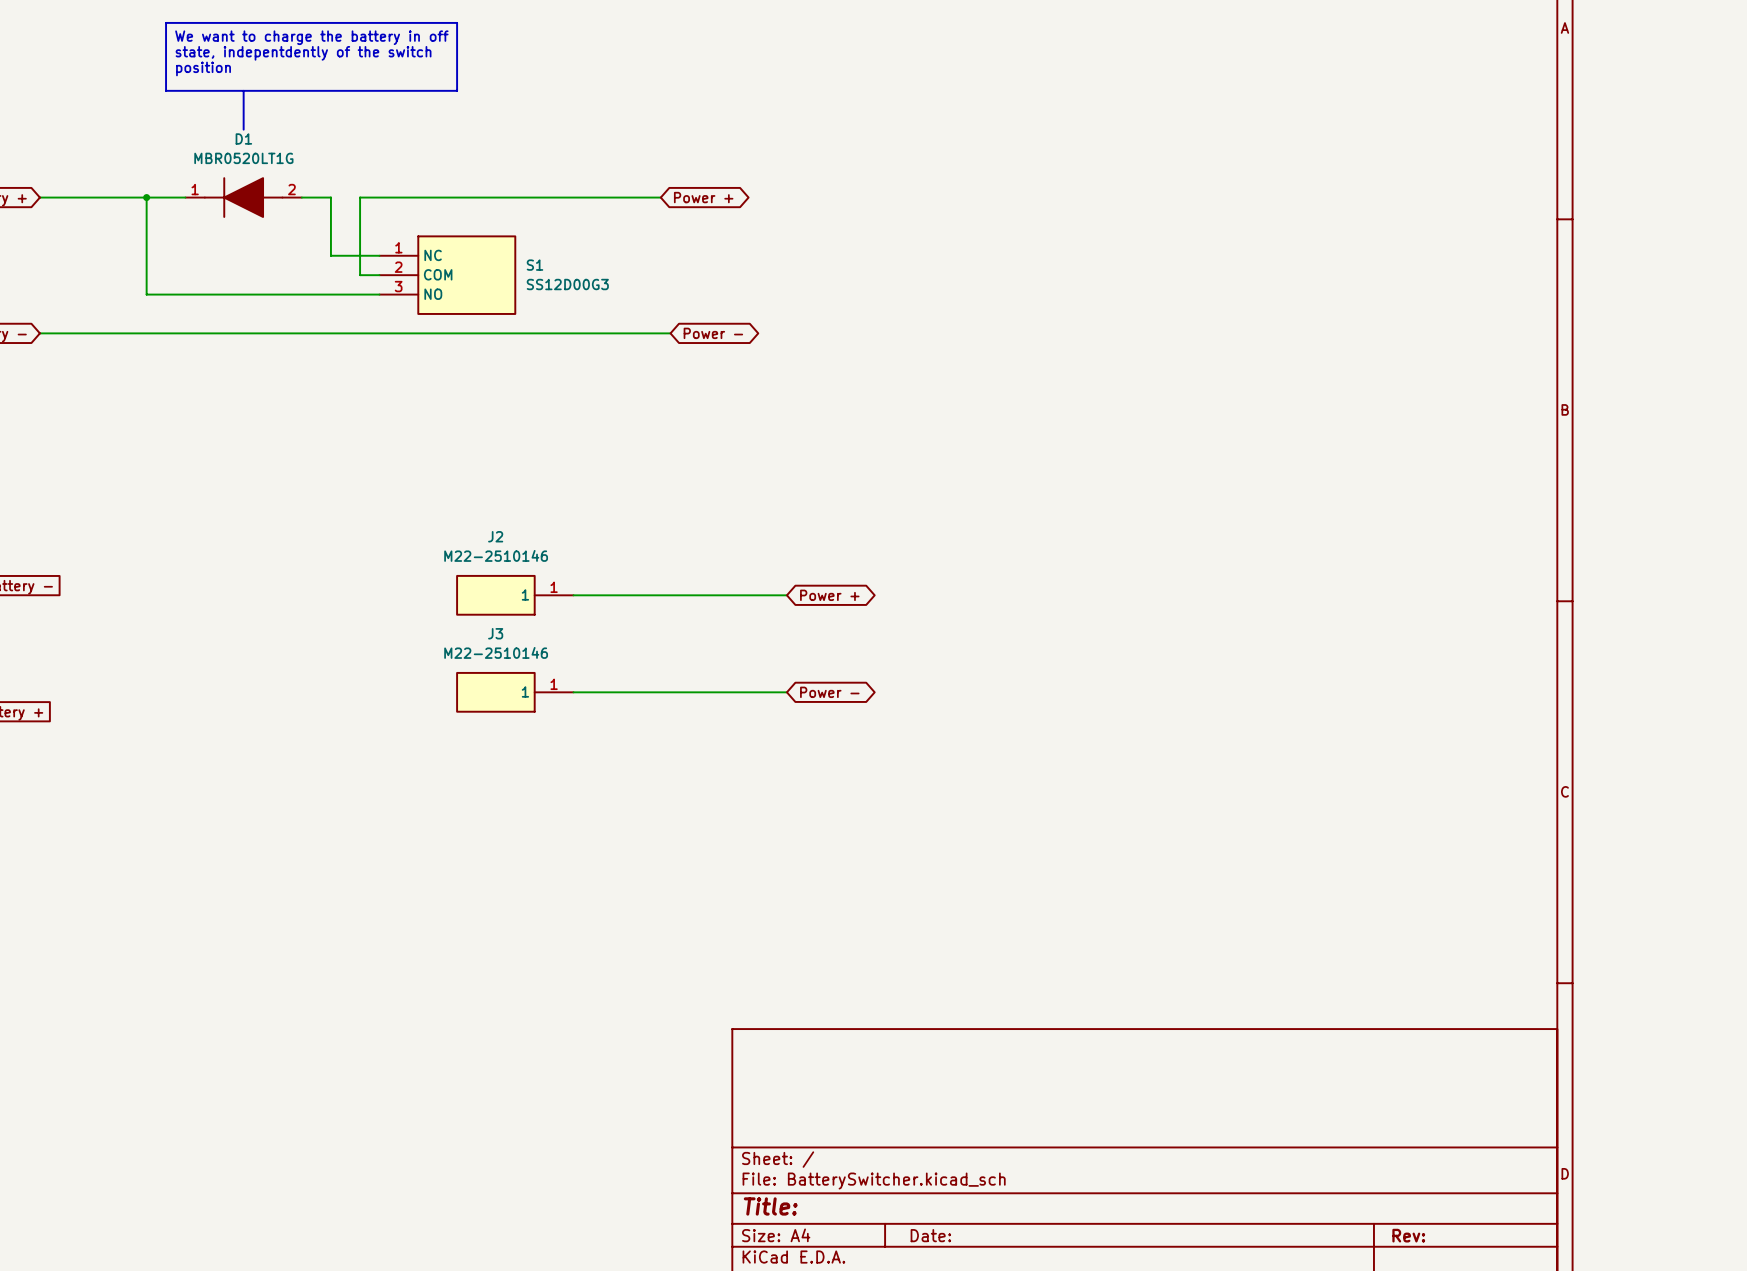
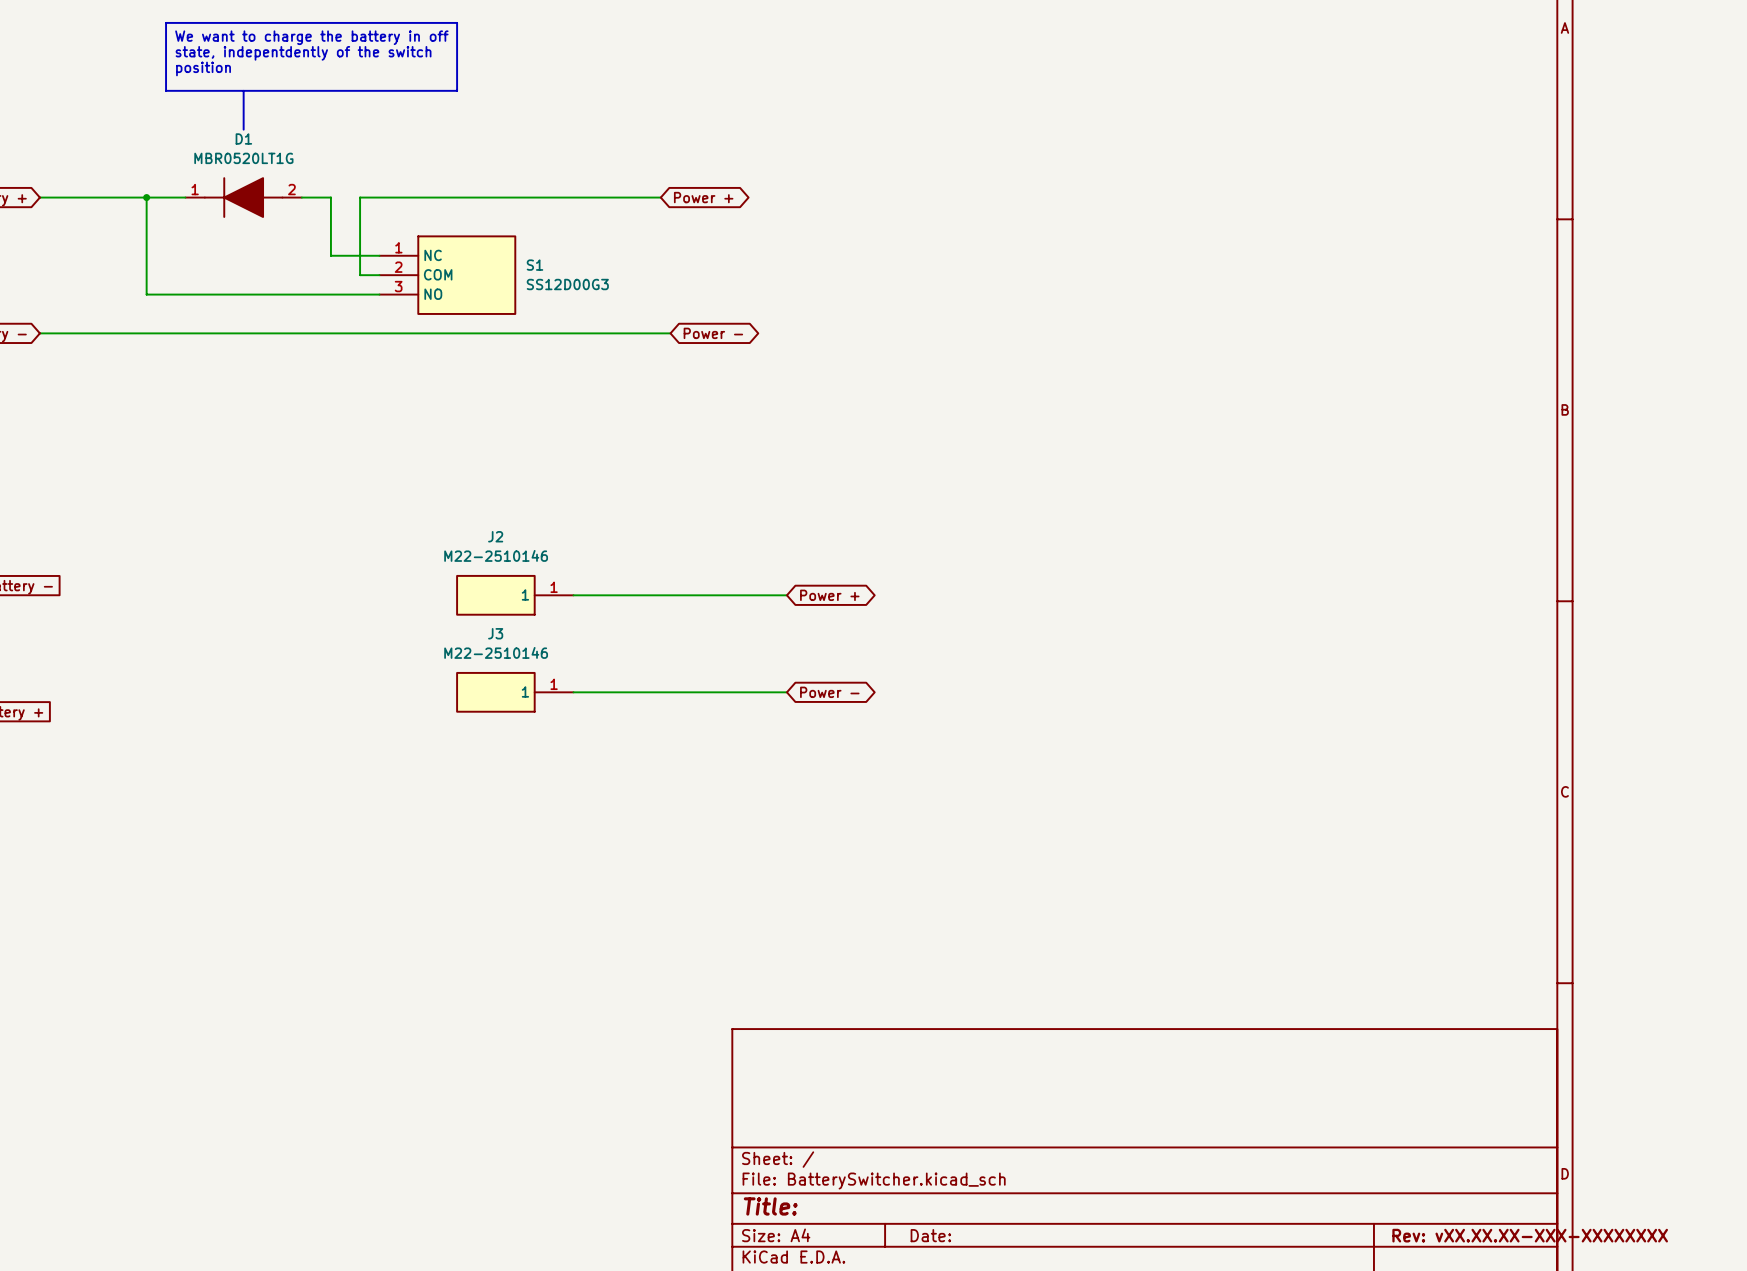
title block: Rev: (1408, 1235) -> Rev: vXX.XX.XX-XXX-XXXXXXXX (1530, 1235)

